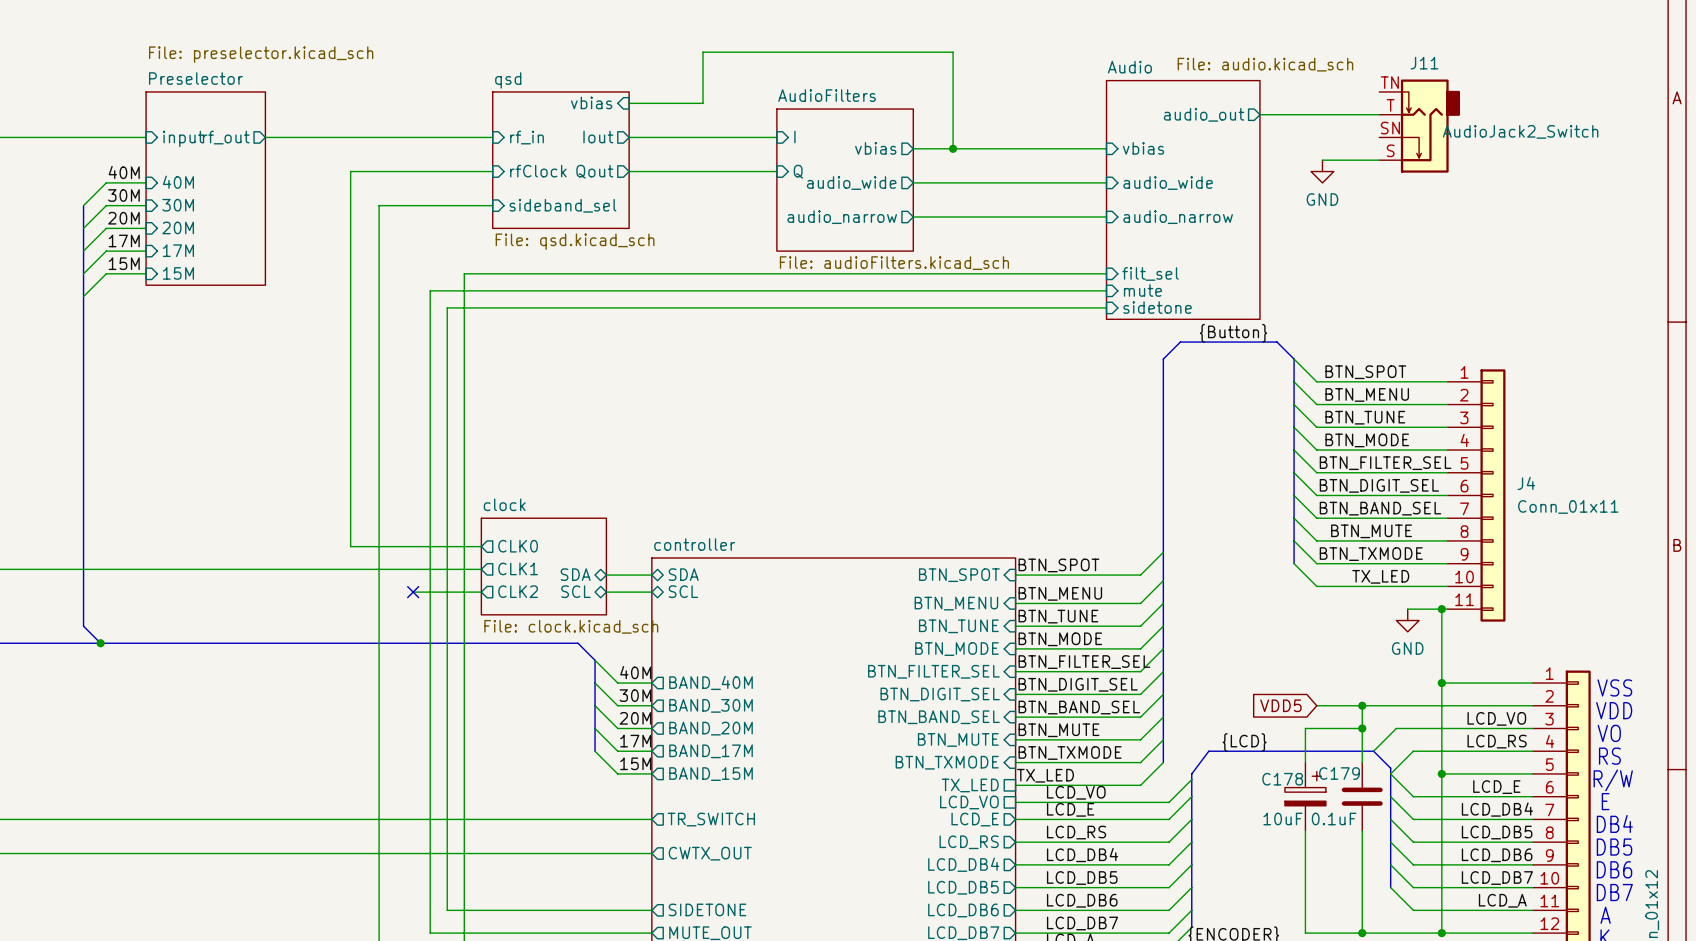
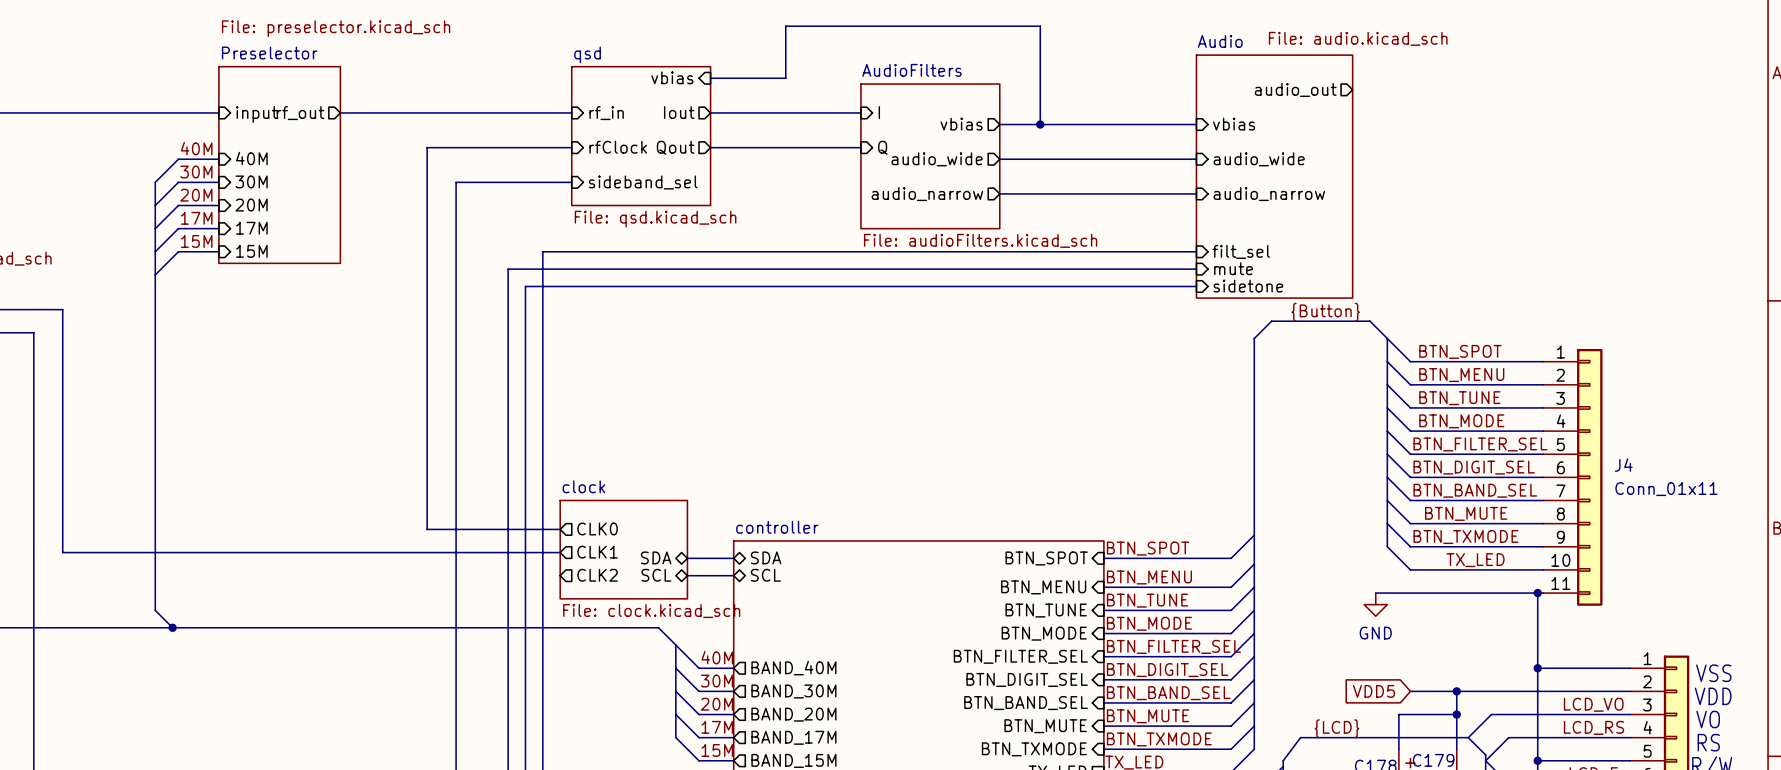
wire: (1259, 114) (1379, 114) -> none
J11: AudioJack2_Switch (1419, 126) -> none
wire: (1322, 160) (1379, 160) -> none
power symbol: GND (1322, 171) -> none
wire: (413, 592) (481, 592) -> none
no-connect mark: (413, 592) -> none
wire: none -> (1375, 593) (1503, 593)
power symbol position: GND (1407, 620) -> GND (1375, 604)

